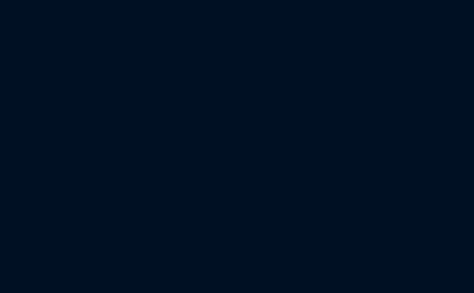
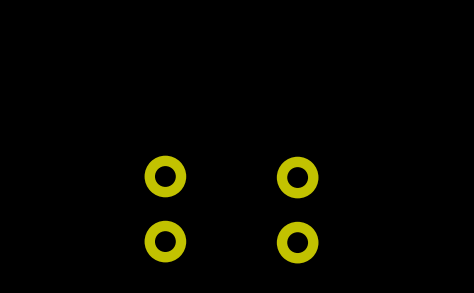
part: none -> (165, 209)
part: none -> (297, 210)

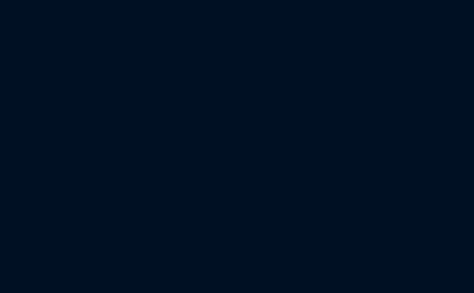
part: (165, 209) -> none
part: (297, 210) -> none

